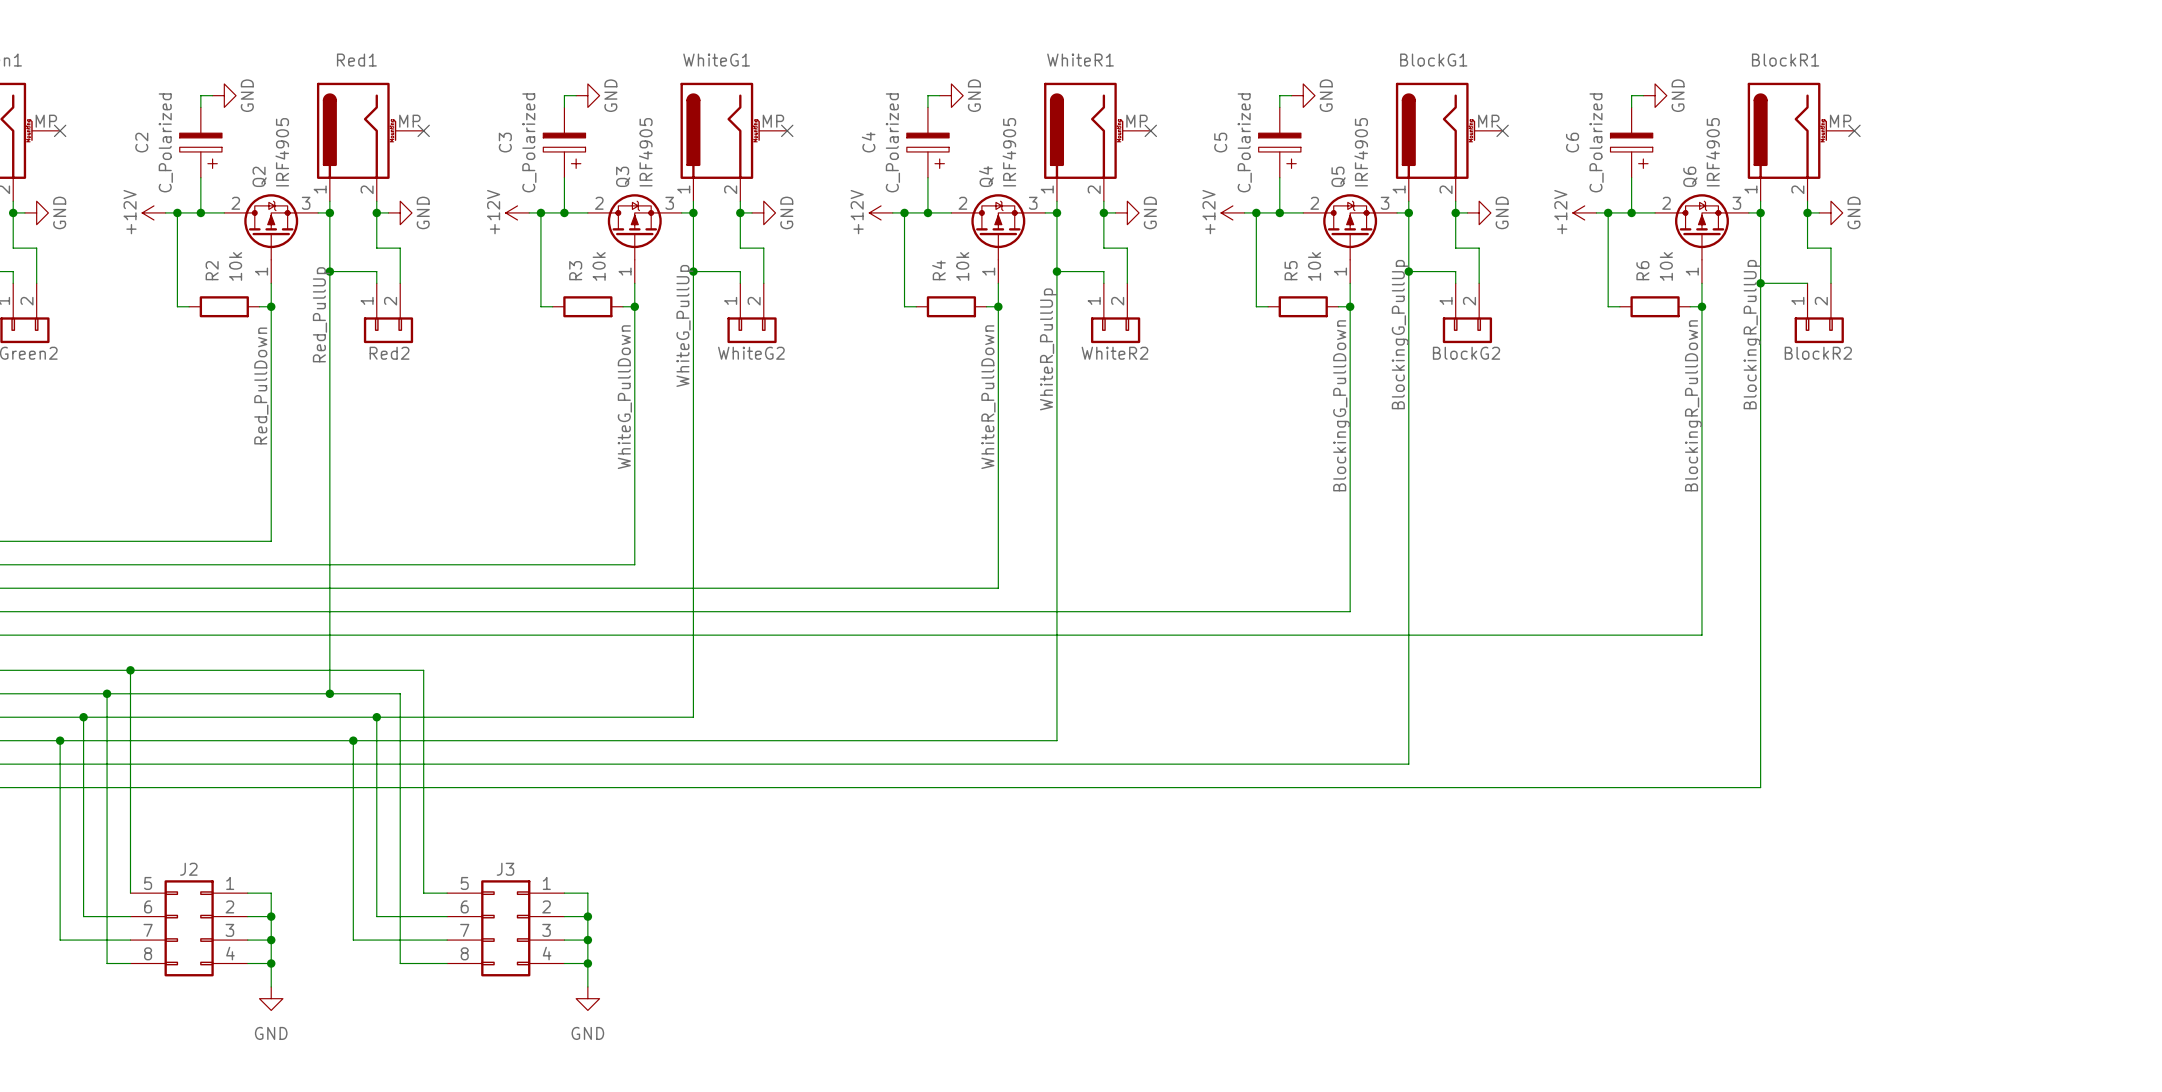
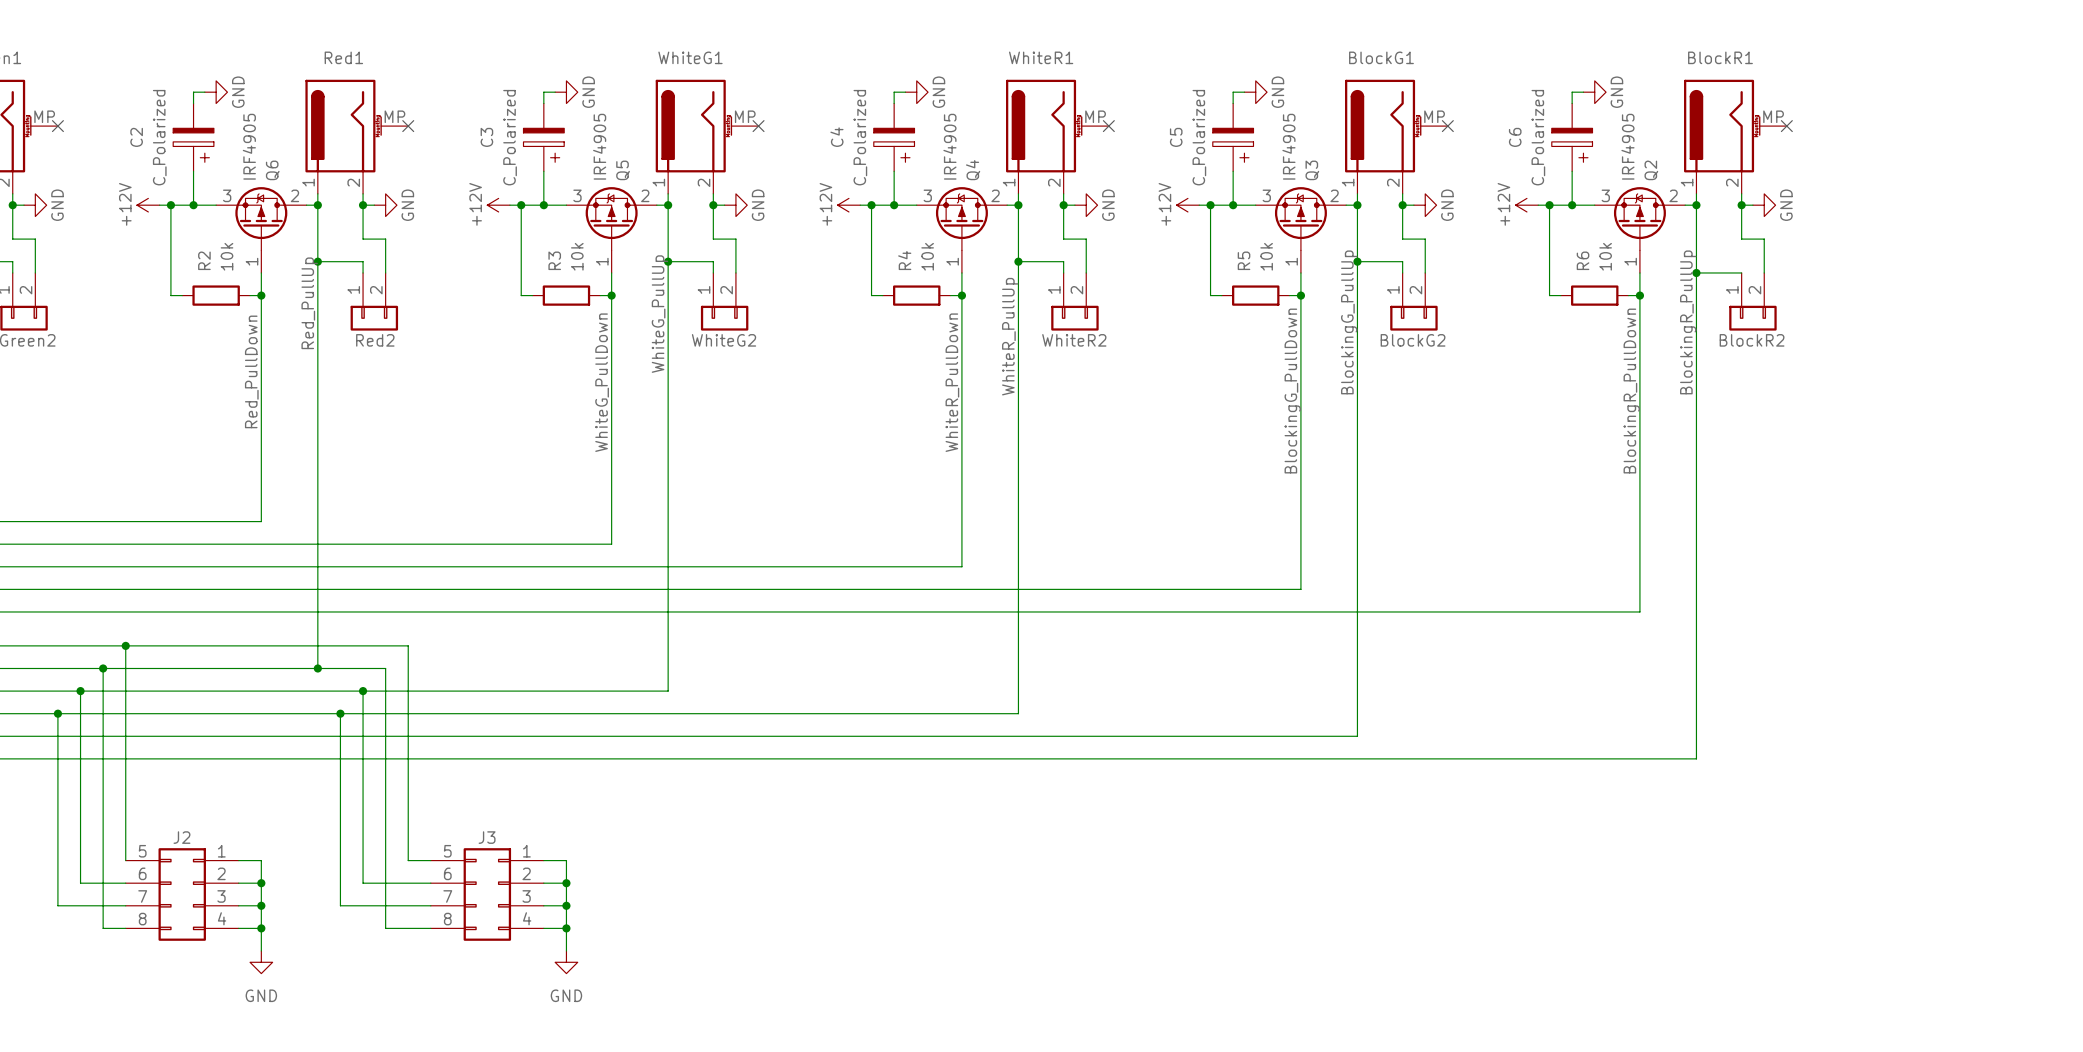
Q2 flip: as is (271, 227) -> left-right (1639, 218)
Q3 flip: as is (634, 227) -> left-right (1300, 218)
Q4 flip: as is (998, 227) -> left-right (961, 218)
Q5 flip: as is (1350, 227) -> left-right (611, 218)
Q6 flip: as is (1701, 227) -> left-right (261, 218)
Q2 position: (271, 238) -> (1639, 230)
Q3 position: (634, 238) -> (1300, 230)
Q5 position: (1350, 238) -> (611, 230)
Q6 position: (1701, 238) -> (261, 230)

